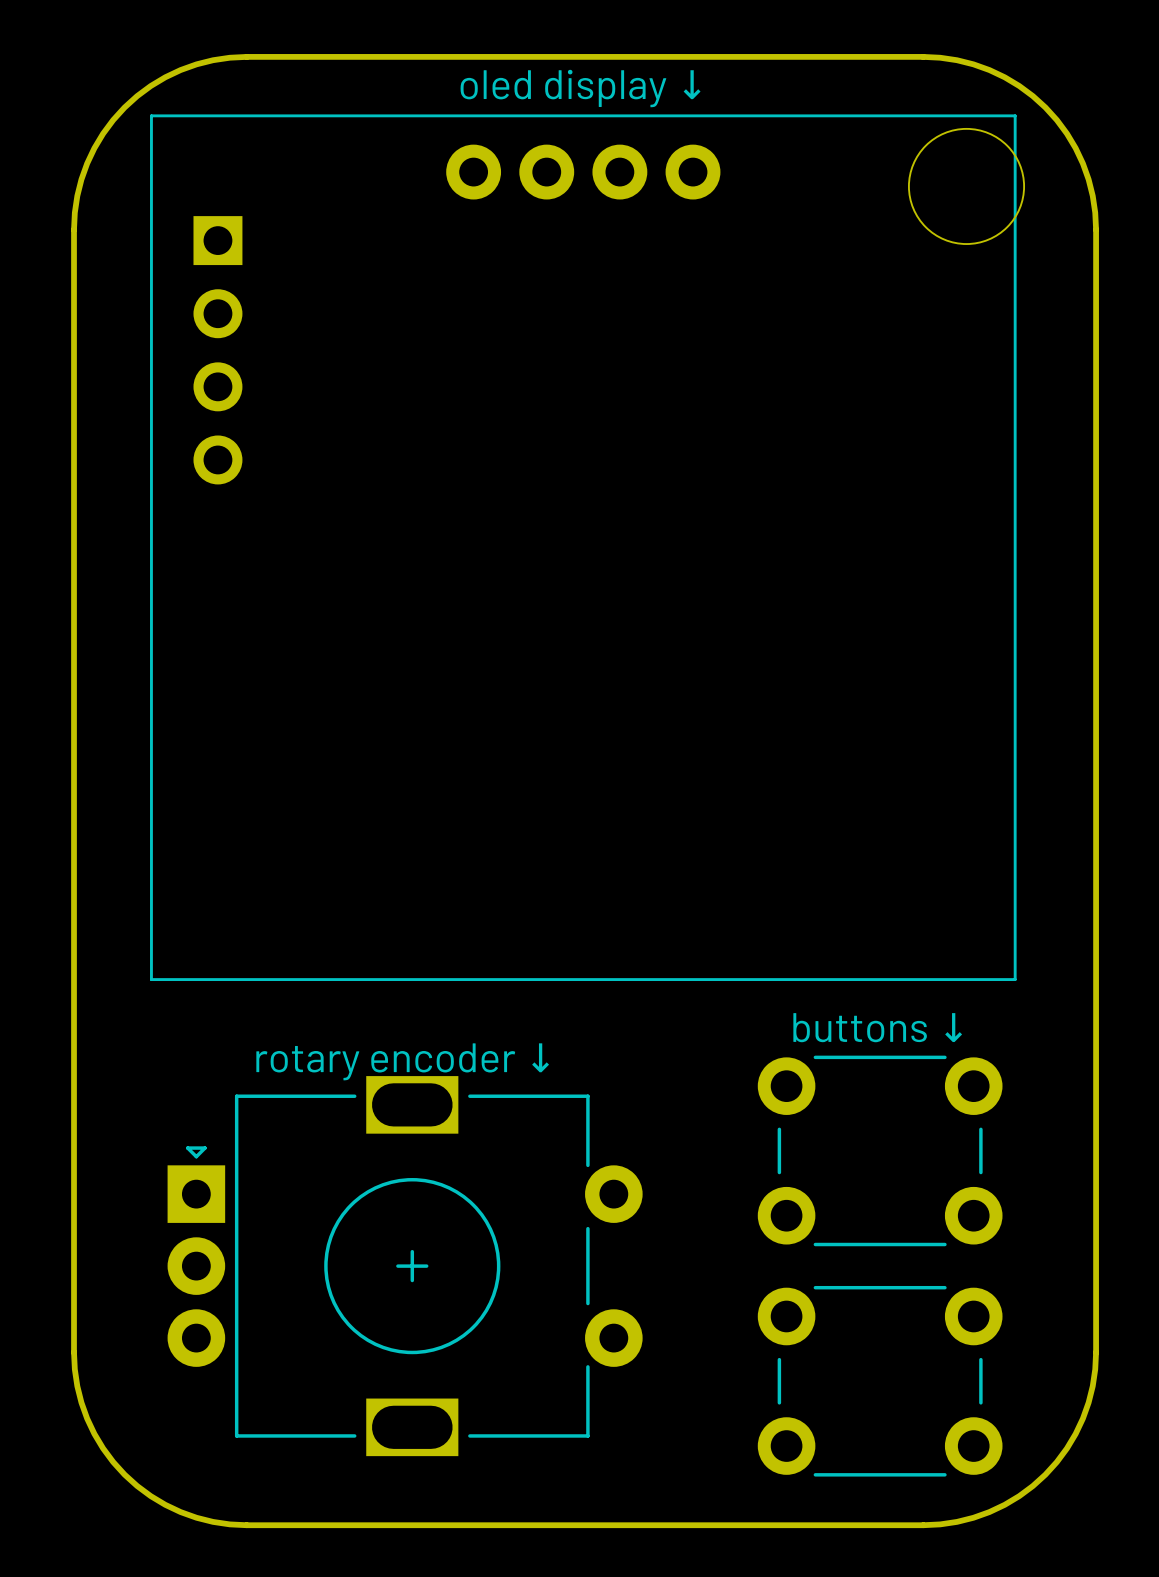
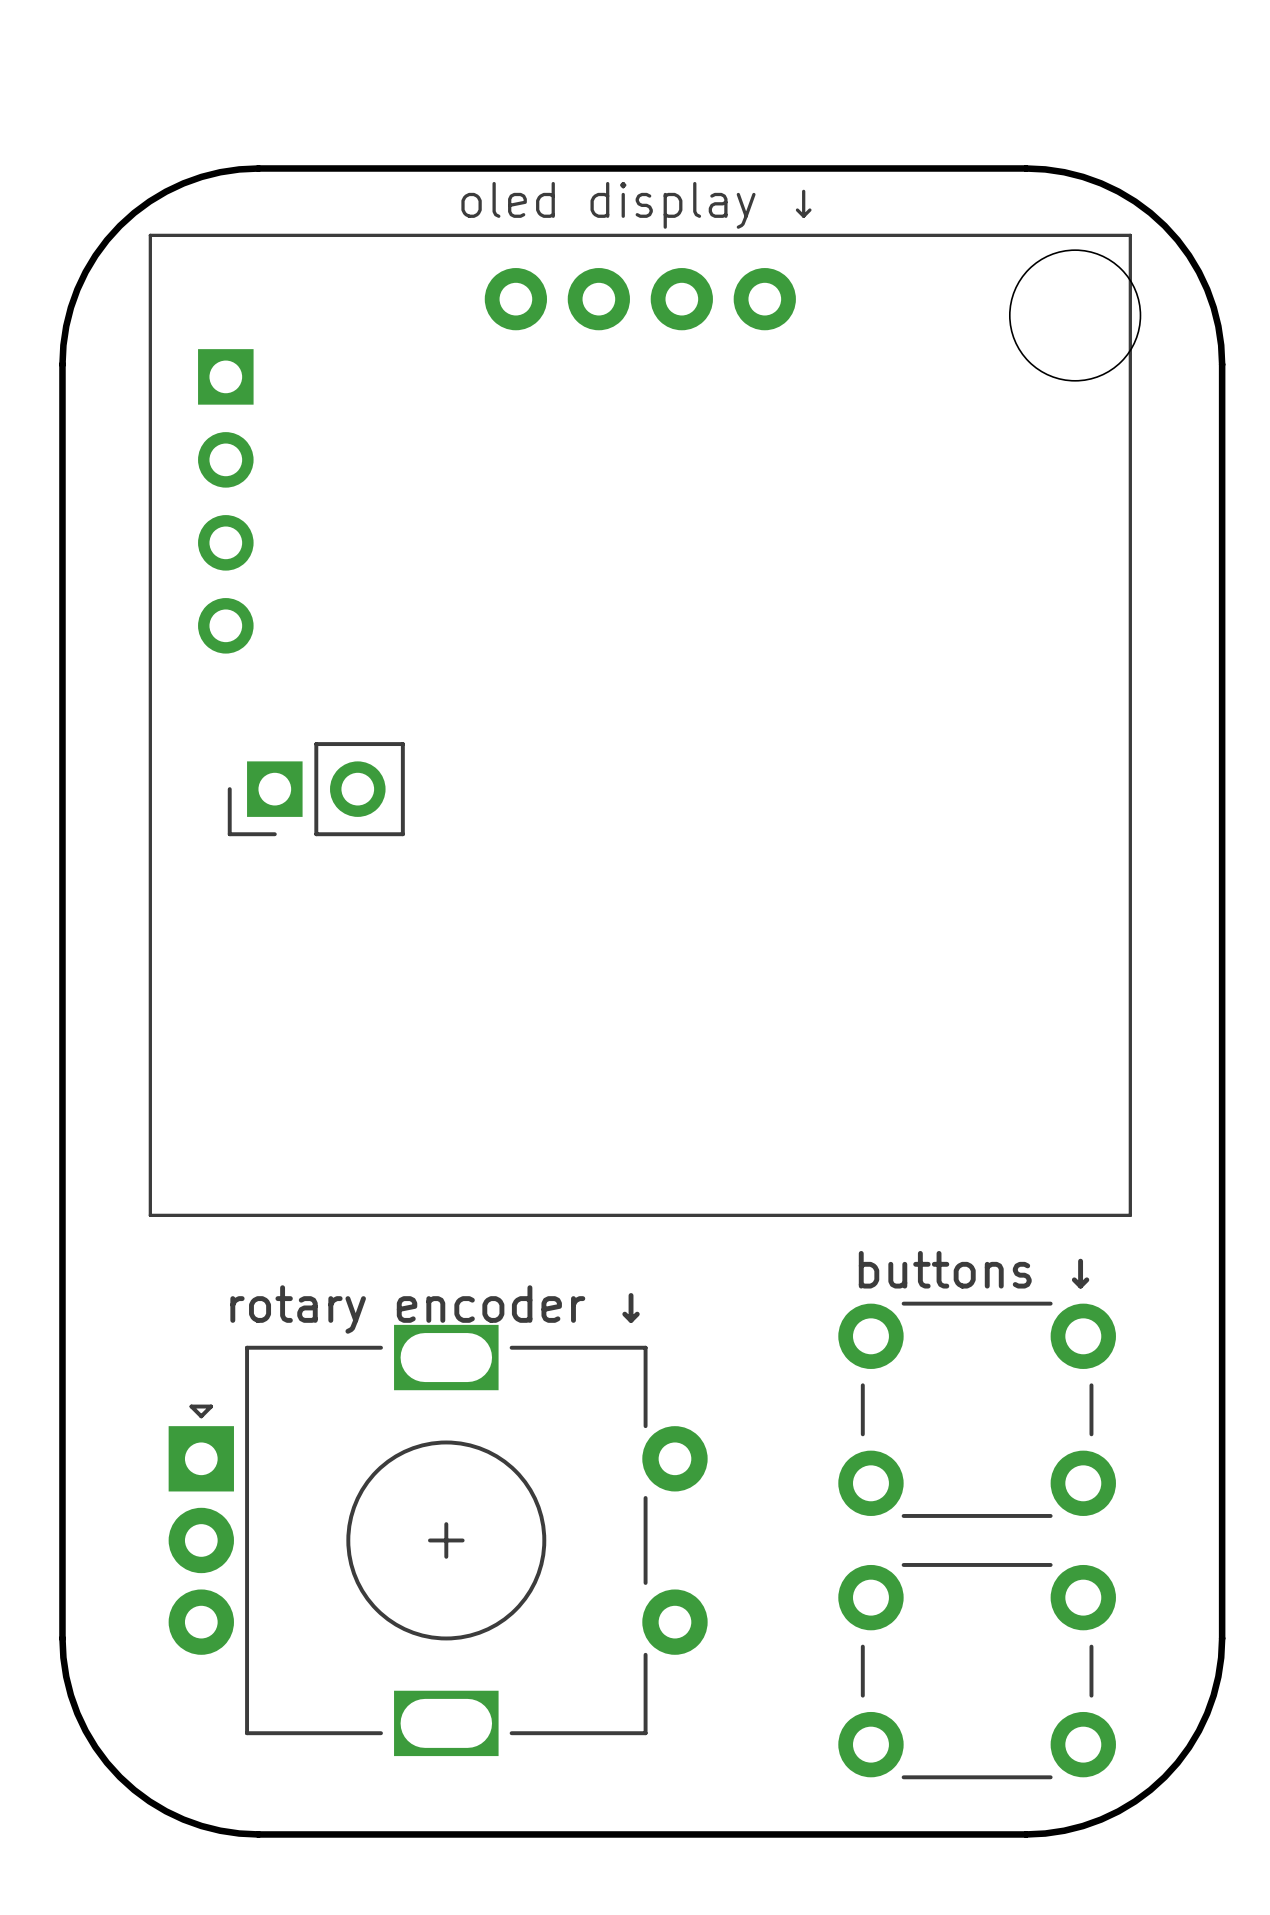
part: none -> (316, 789)

